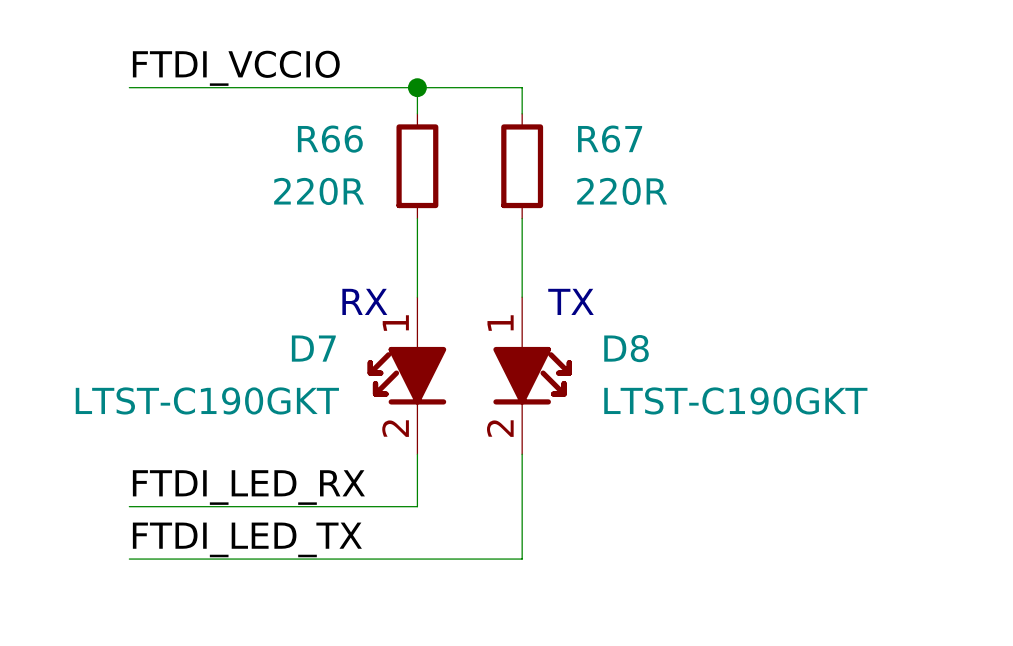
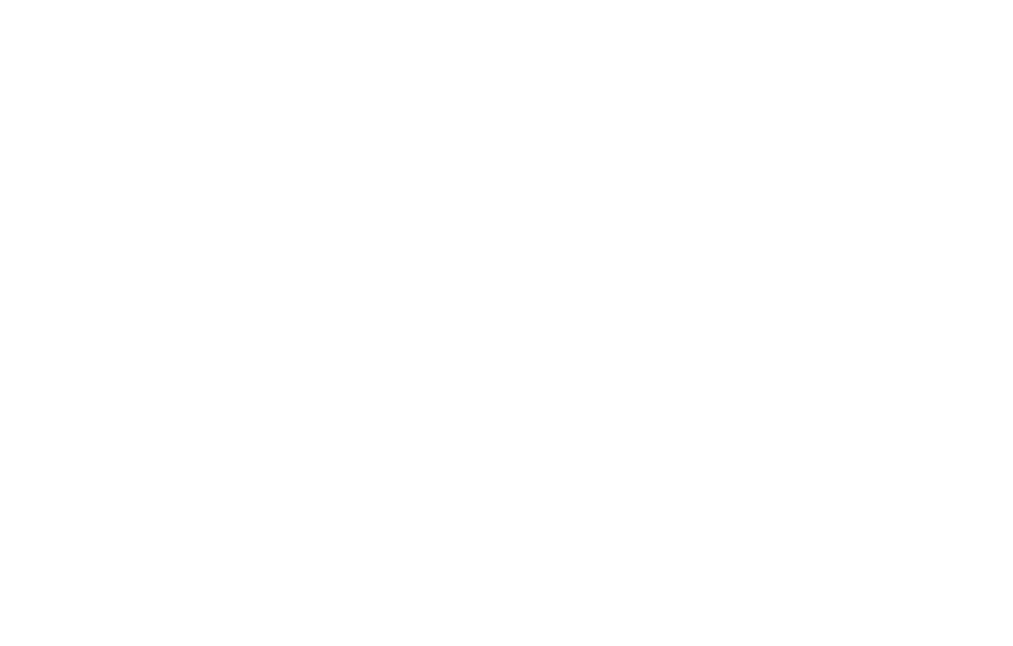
label: FTDI_VCCIO (236, 68) -> none
wire: (129, 87) (522, 87) (522, 113) -> none
wire: (417, 87) (417, 113) -> none
junction: (417, 87) -> none
R66: (417, 166) -> none
R67: (522, 166) -> none
wire: (417, 218) (417, 297) -> none
wire: (522, 218) (522, 297) -> none
text: RX (364, 301) -> none
text: TX (571, 301) -> none
D7: (406, 375) -> none
D8: (532, 375) -> none
wire: (417, 454) (417, 506) (129, 506) -> none
wire: (522, 454) (522, 559) (129, 559) -> none
label: FTDI_LED_RX (248, 487) -> none
label: FTDI_LED_TX (247, 539) -> none

